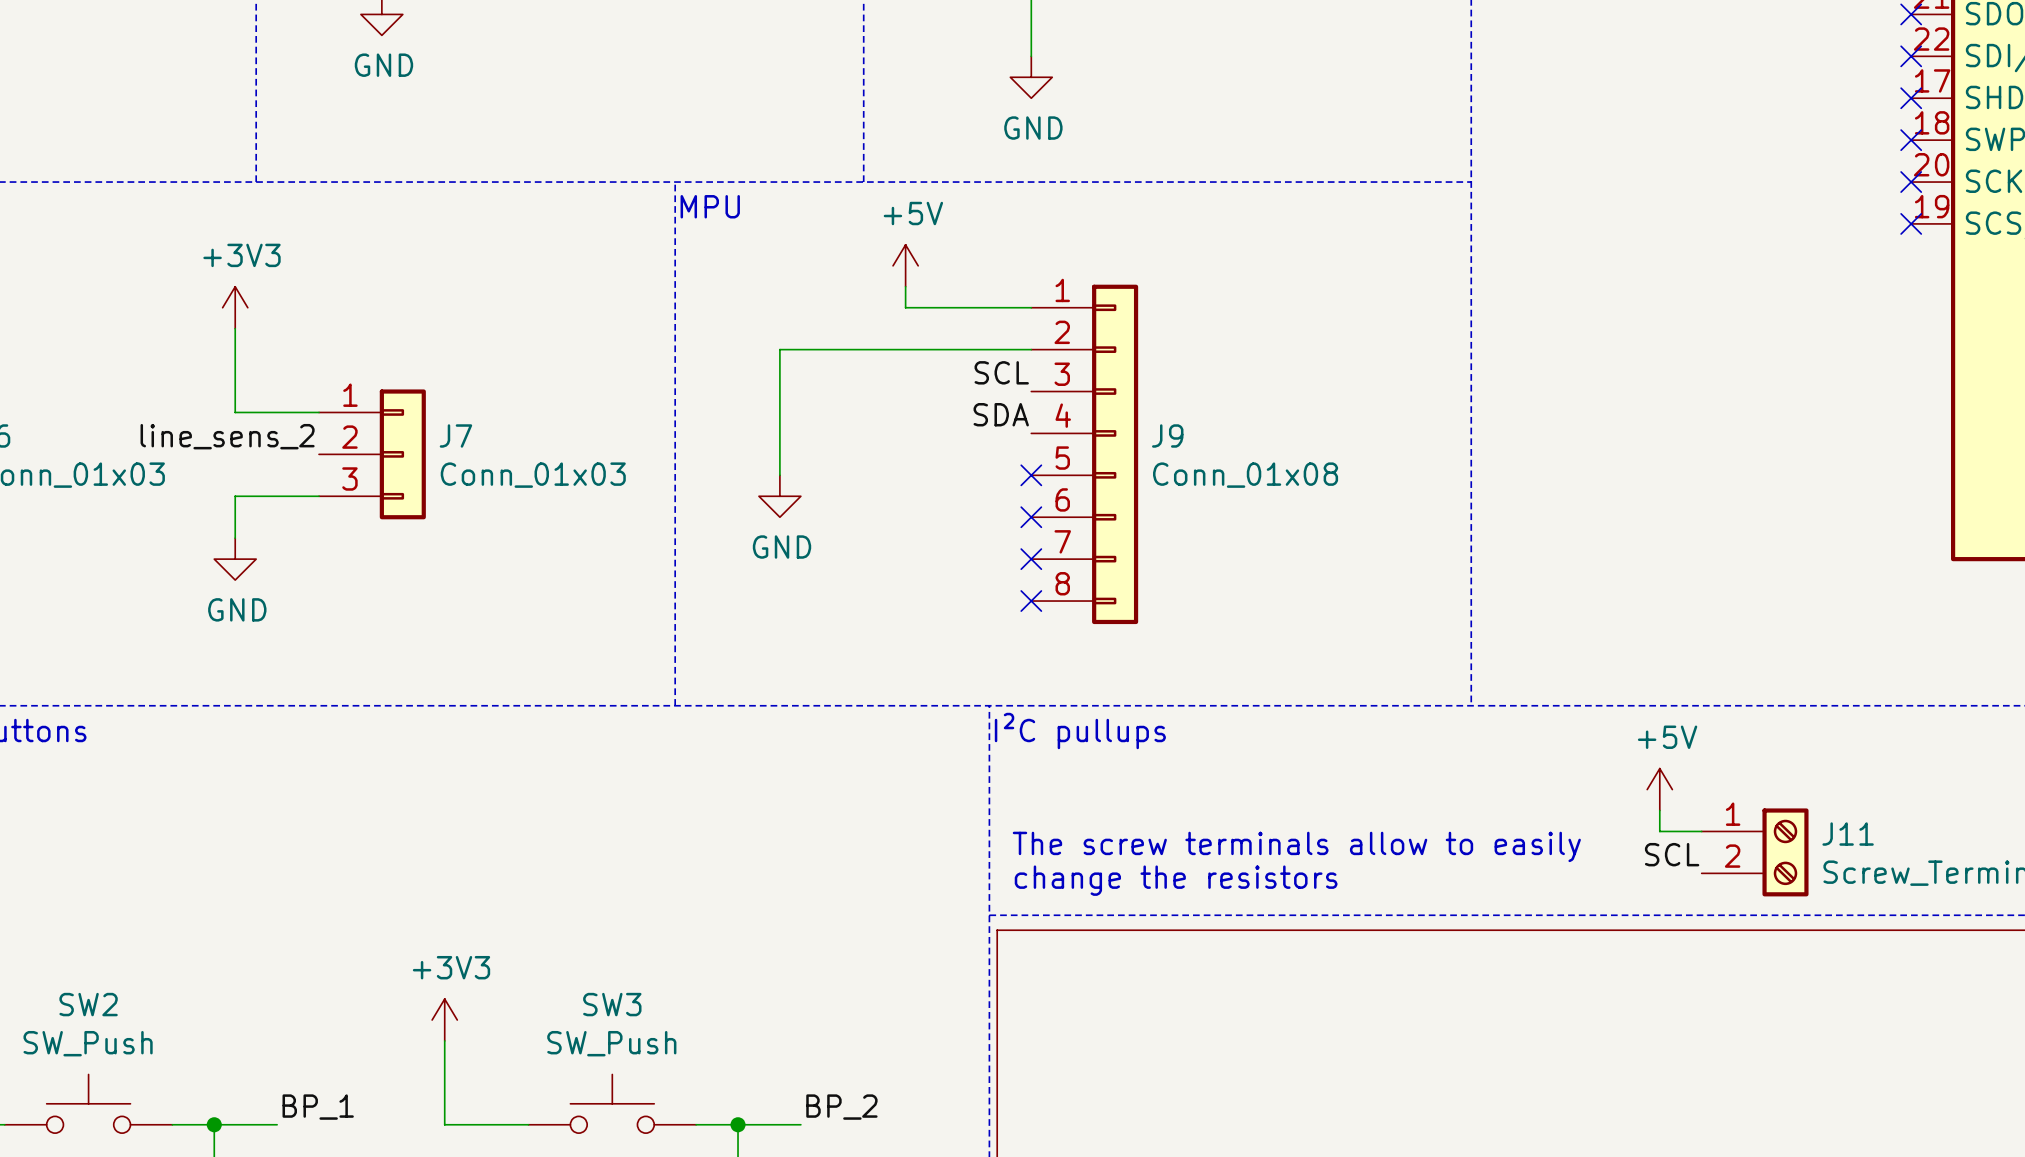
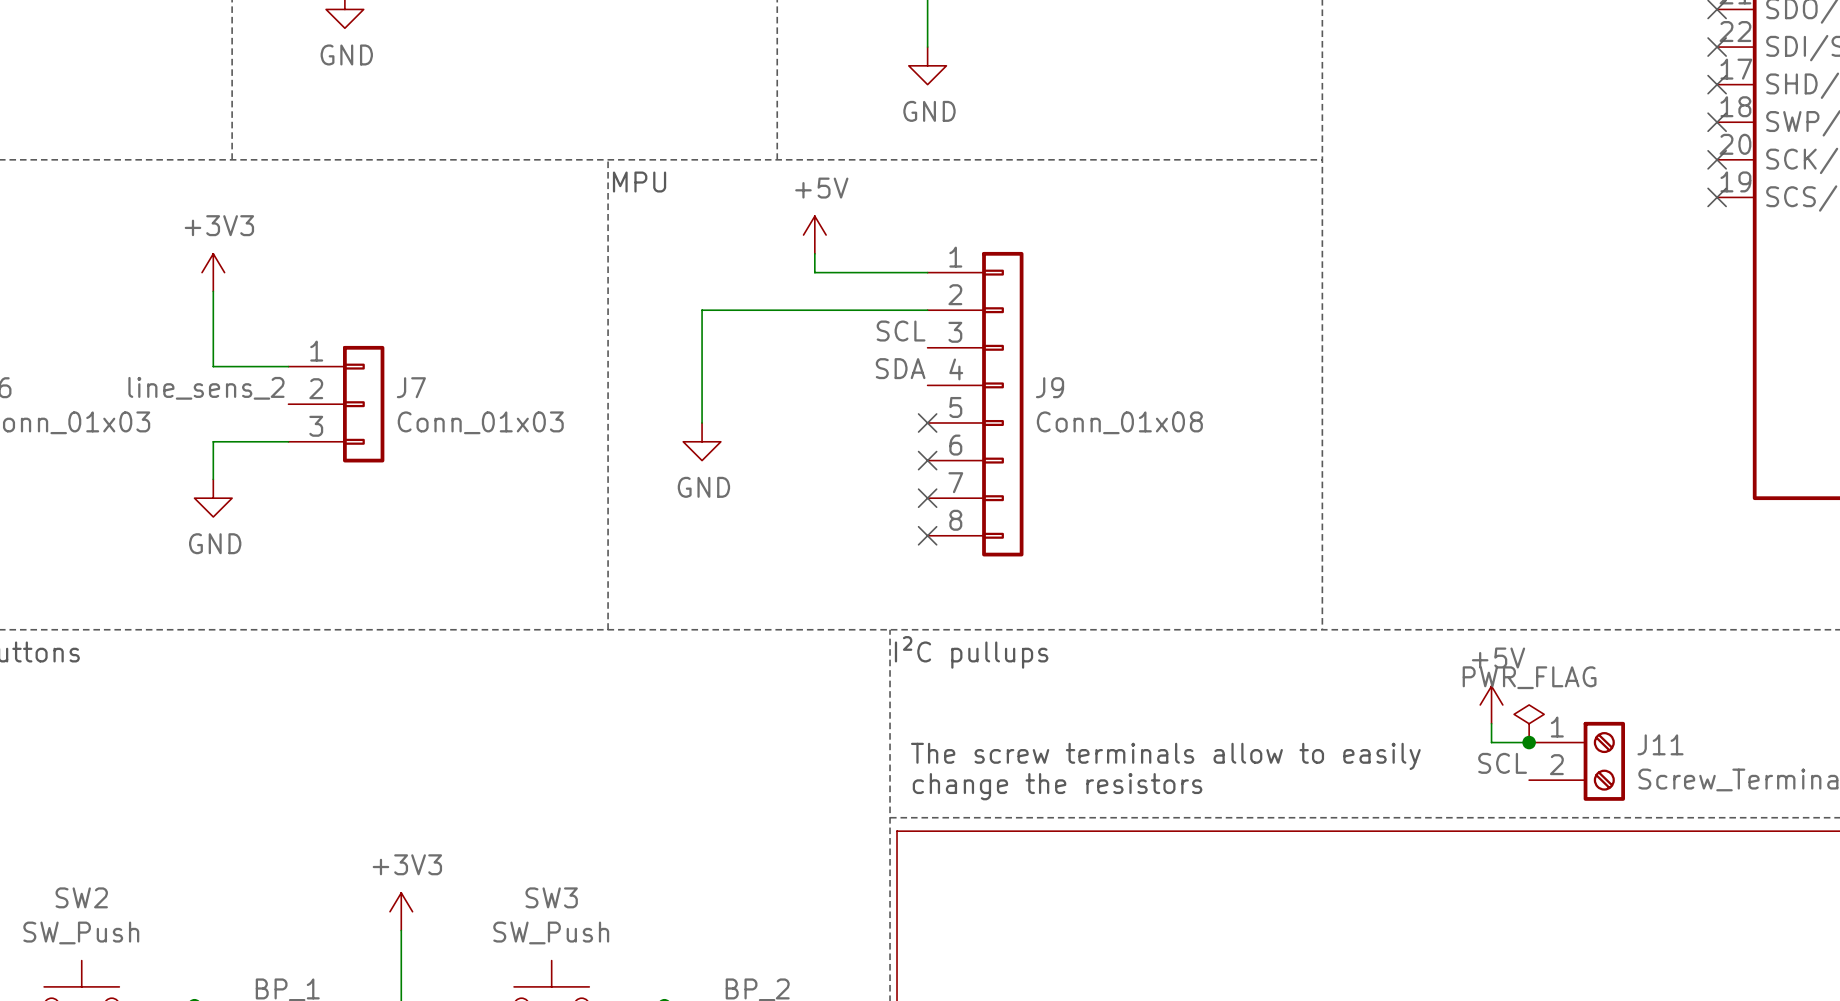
power symbol: none -> PWR_FLAG (1529, 723)
junction: none -> (1529, 742)

